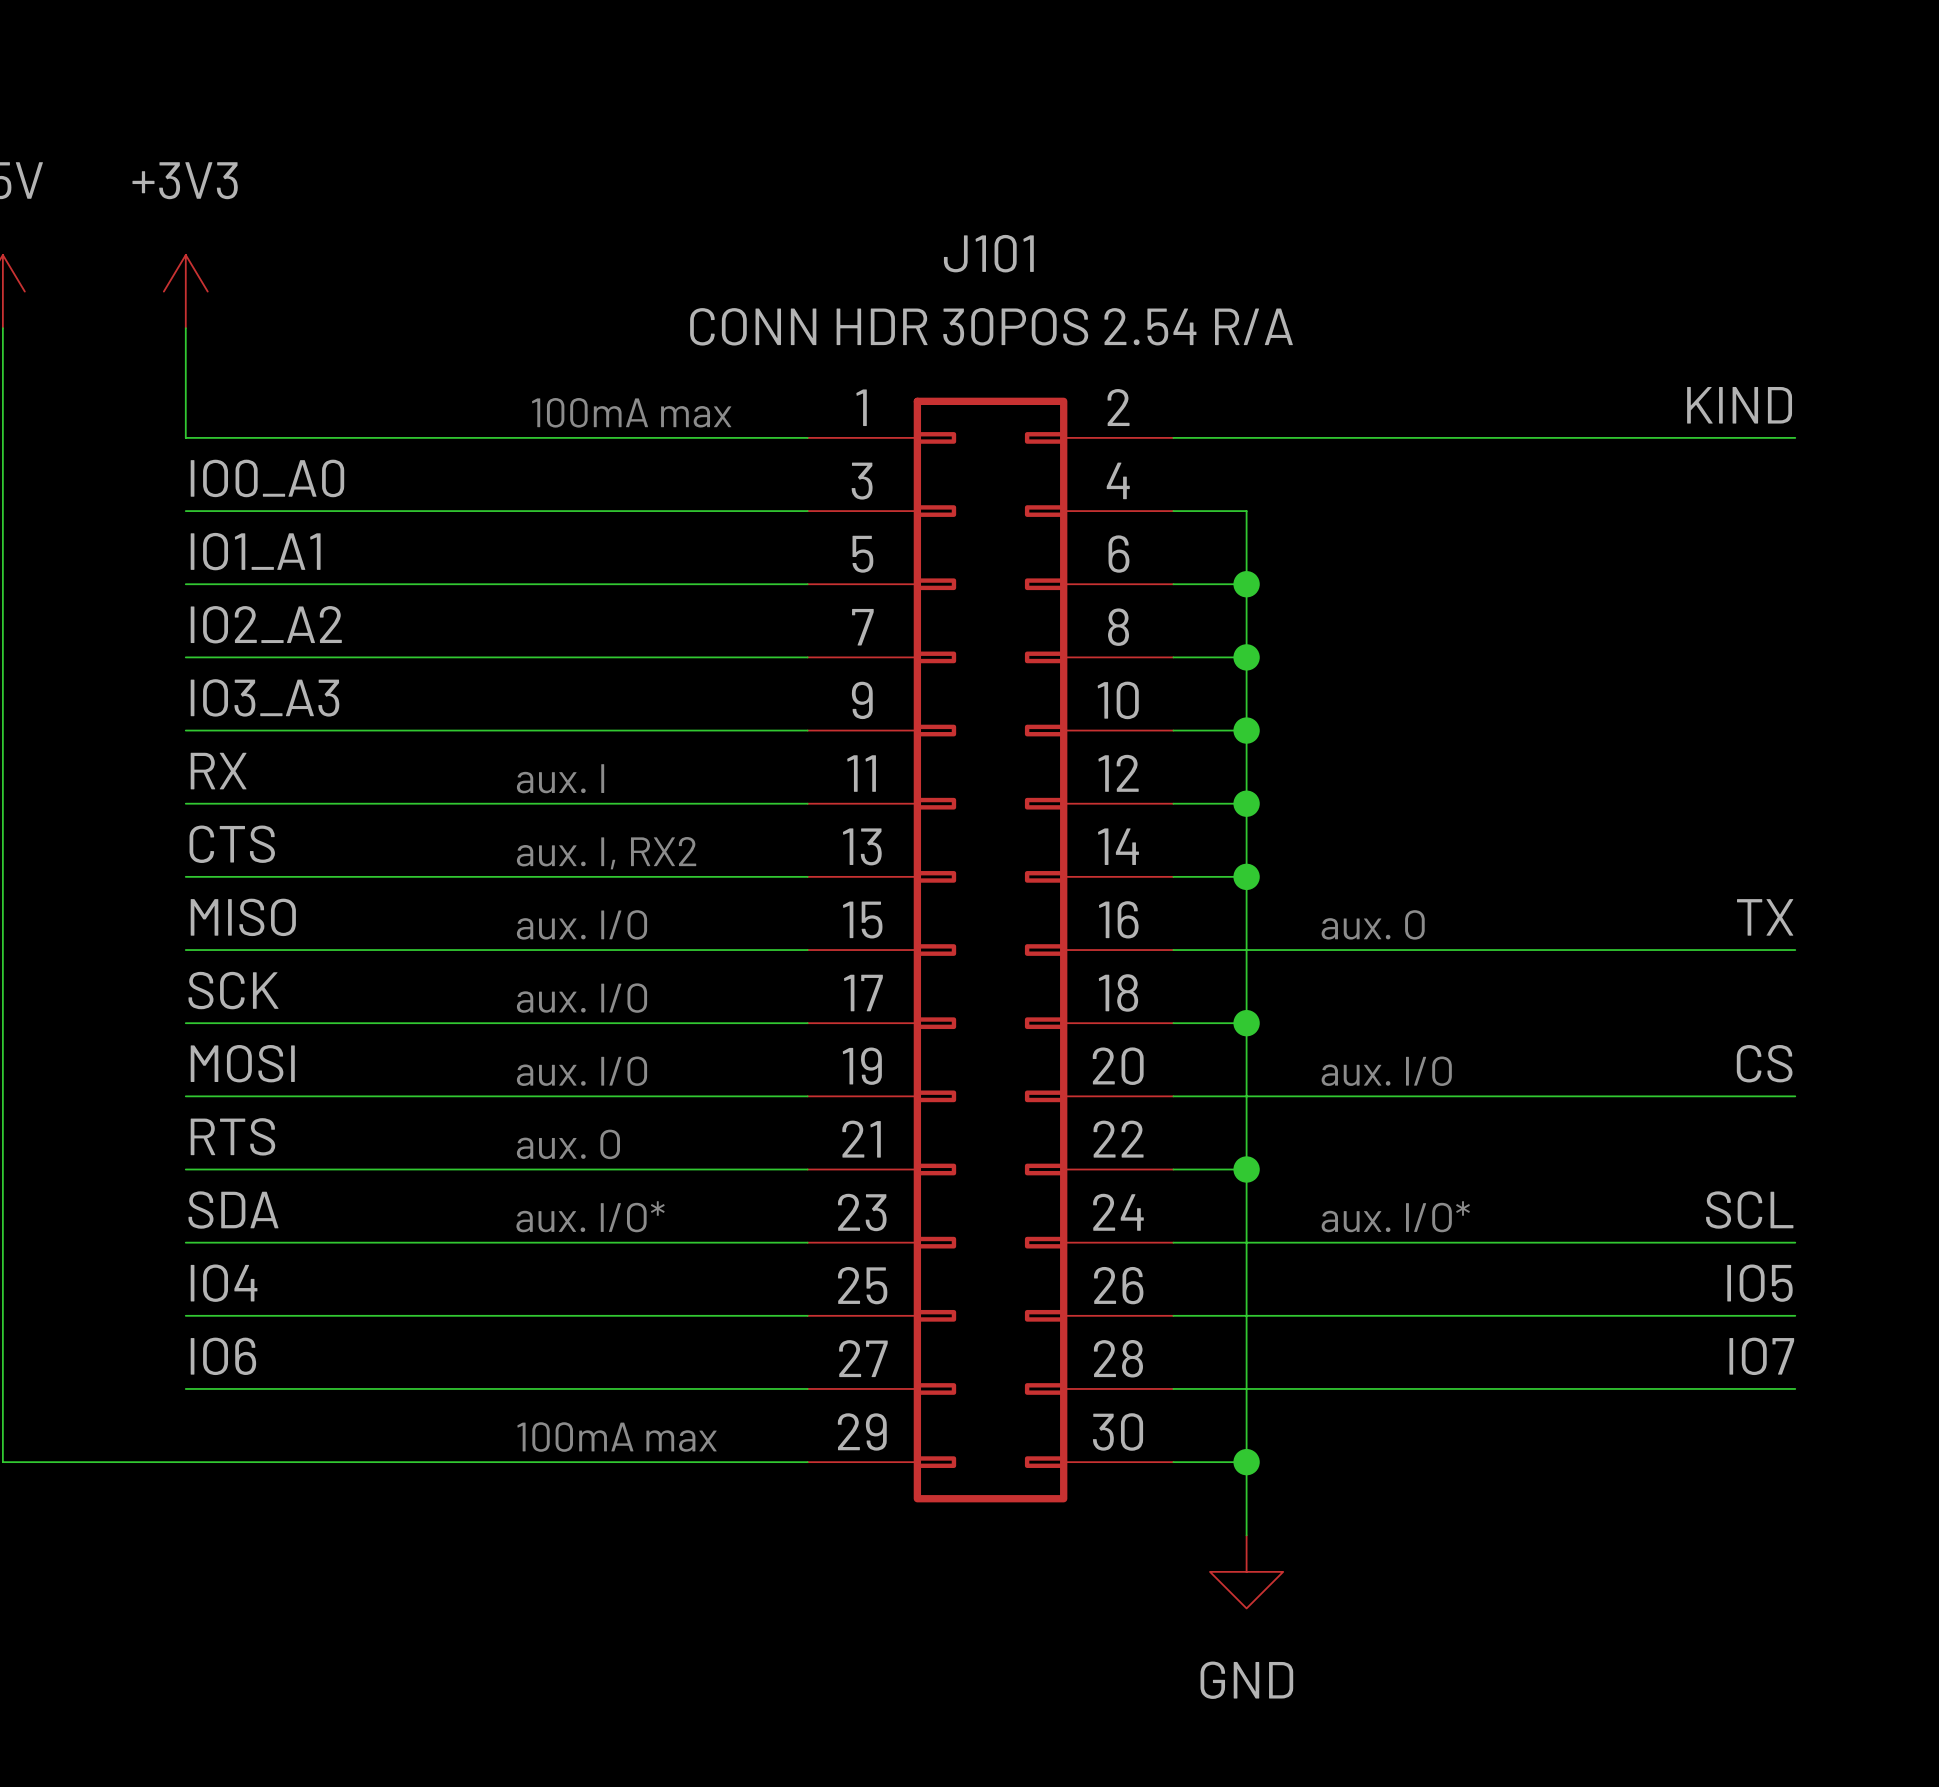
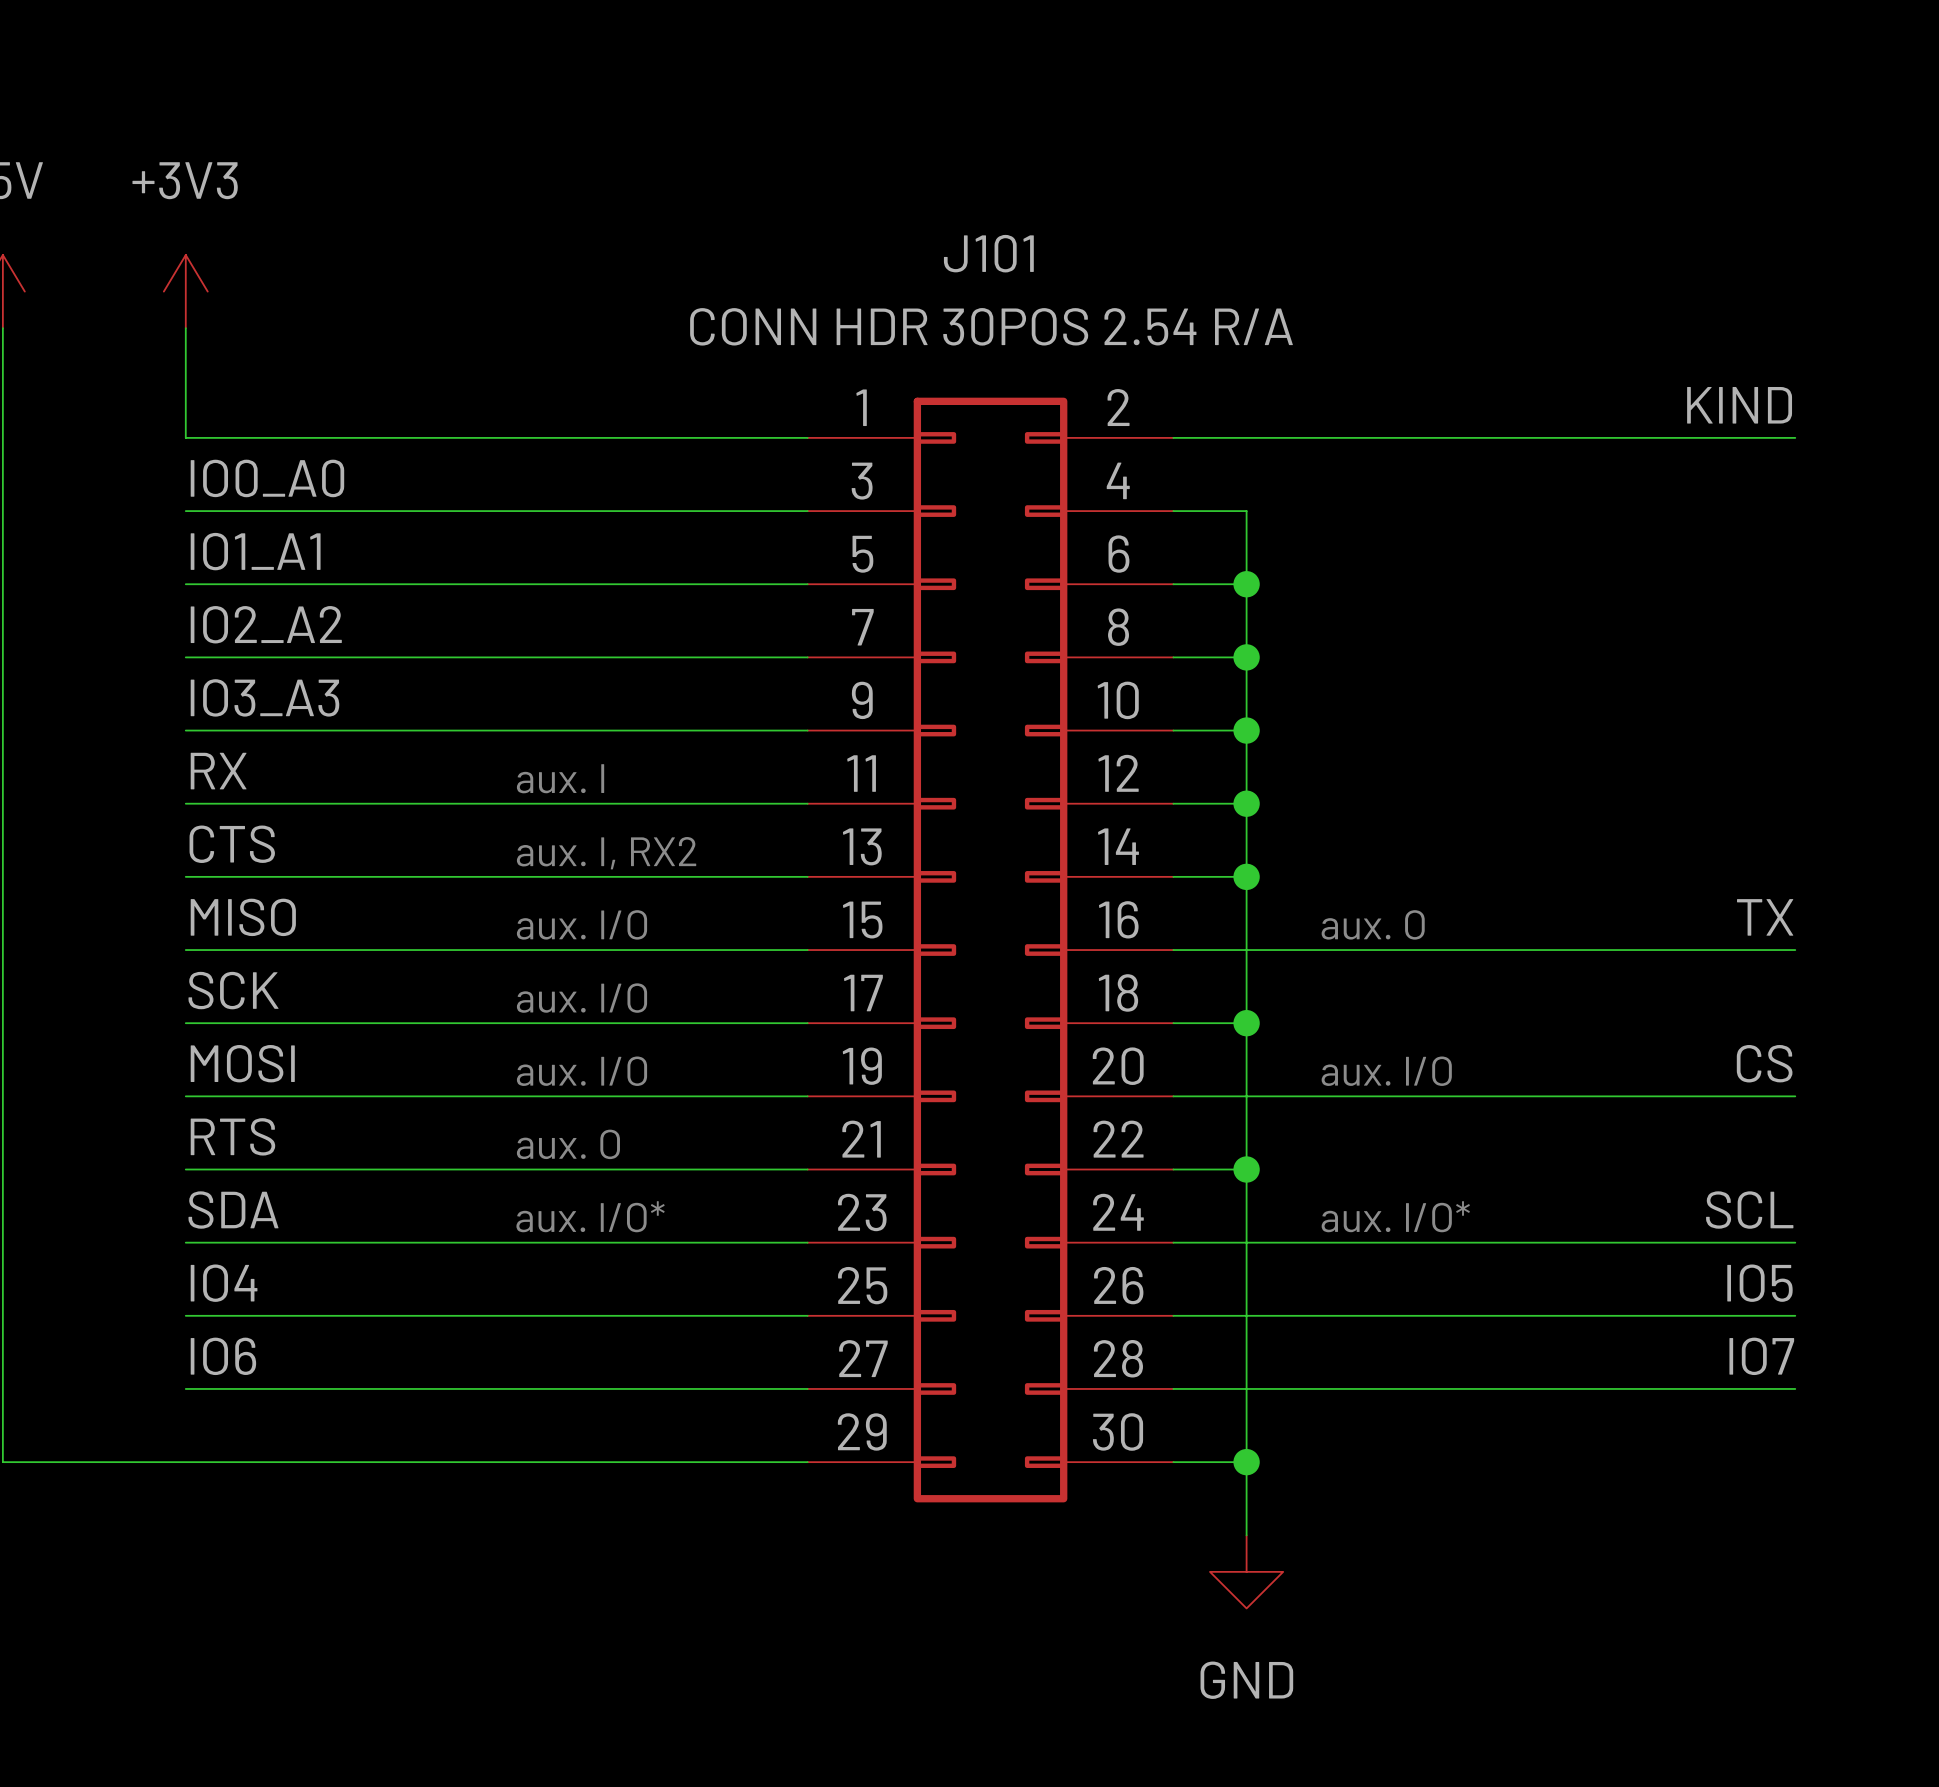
text: 100mA max (631, 412) -> none
text: 100mA max (617, 1437) -> none

